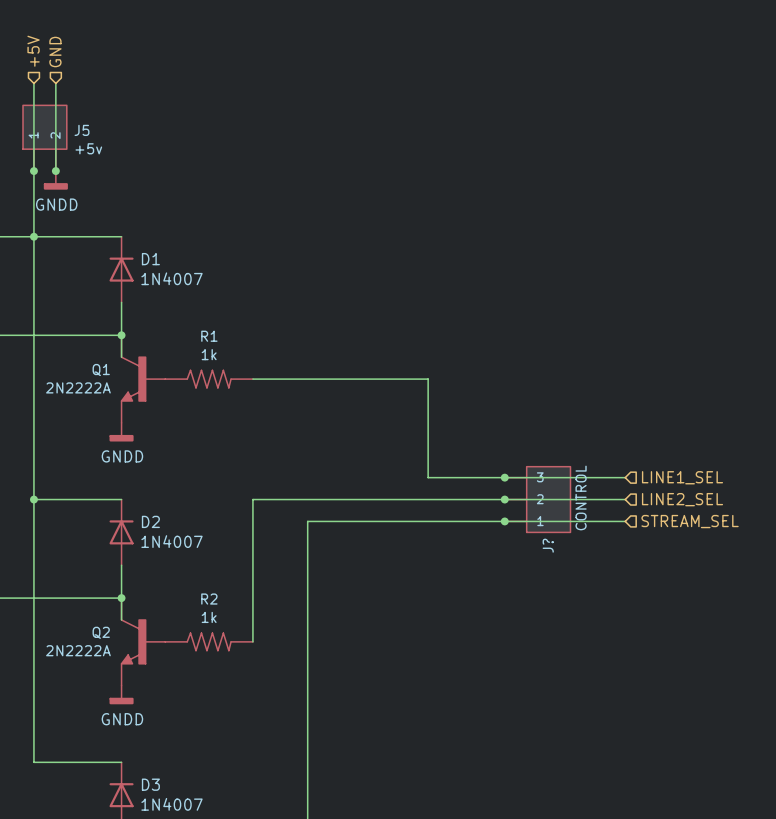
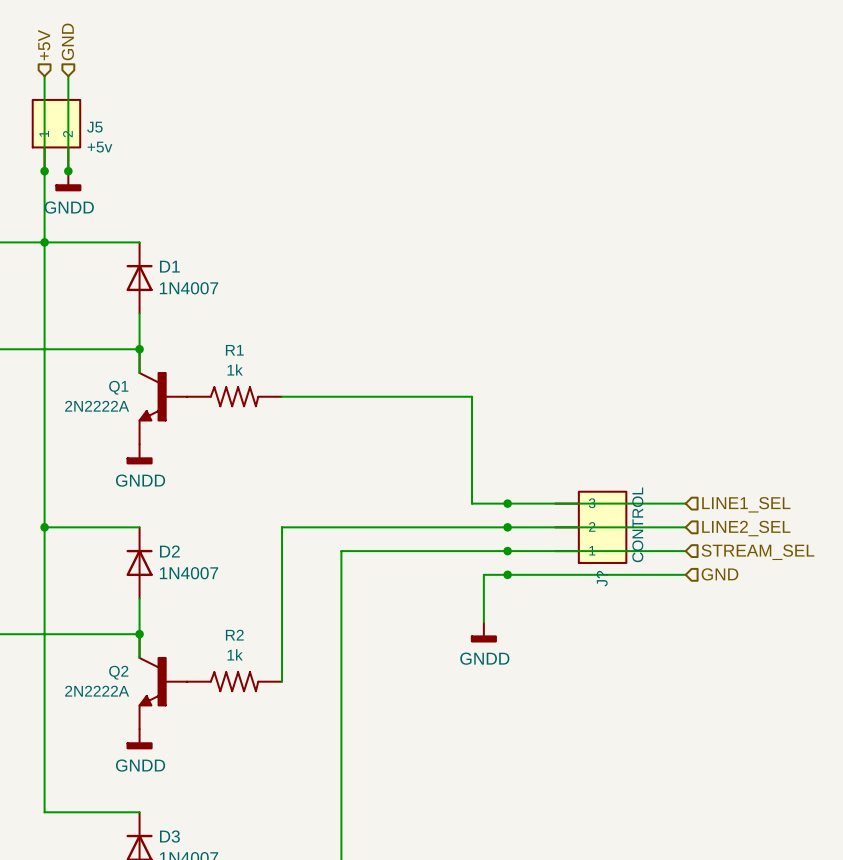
junction: none -> (507, 503)
junction: (504, 477) -> none
junction: none -> (507, 527)
junction: (504, 499) -> none
junction: none -> (507, 551)
junction: (504, 521) -> none
hierarchical label: none -> GND (719, 574)
junction: none -> (507, 574)
wire: none -> (685, 574) (483, 574) (483, 622)
power symbol: none -> GNDD (483, 632)

